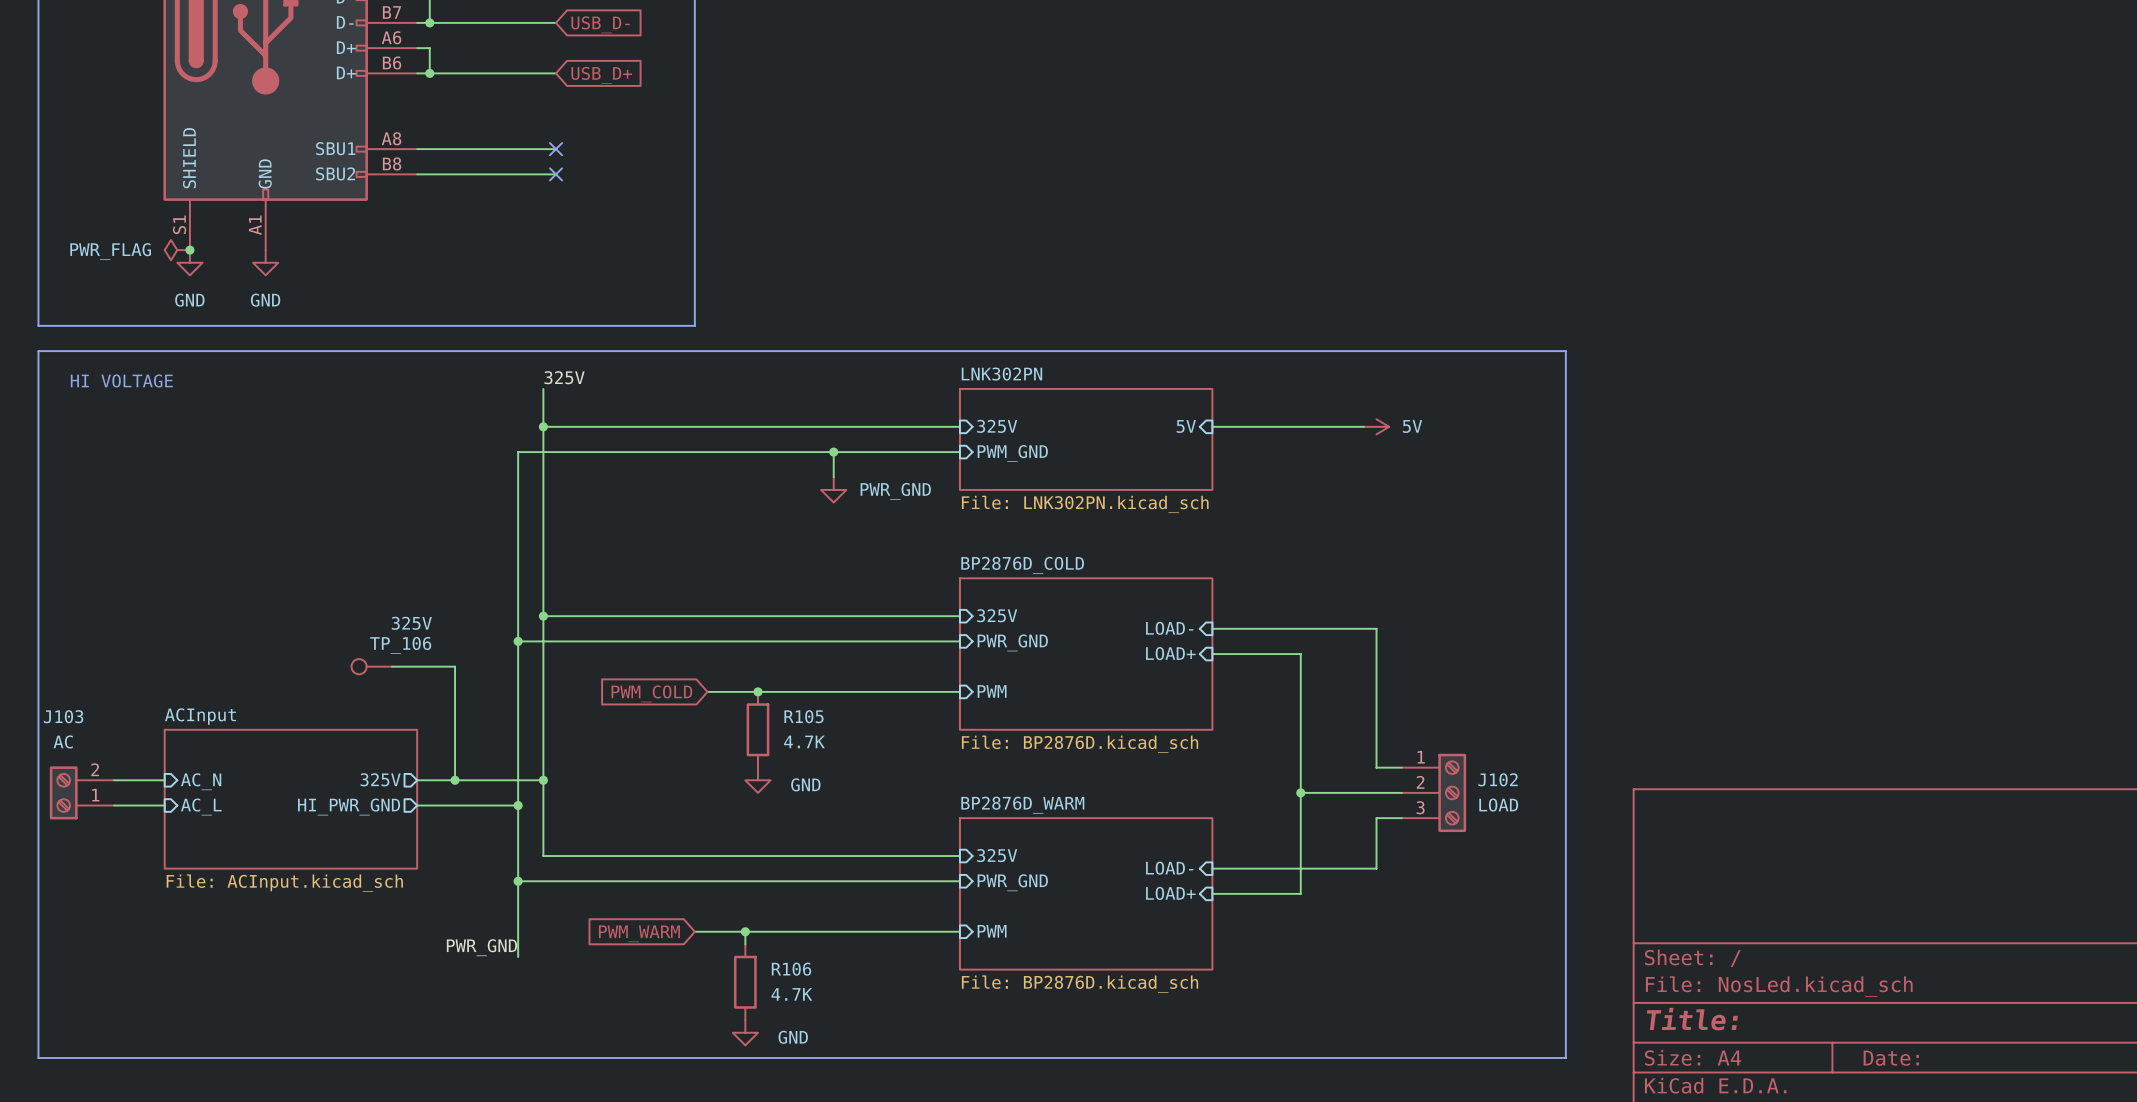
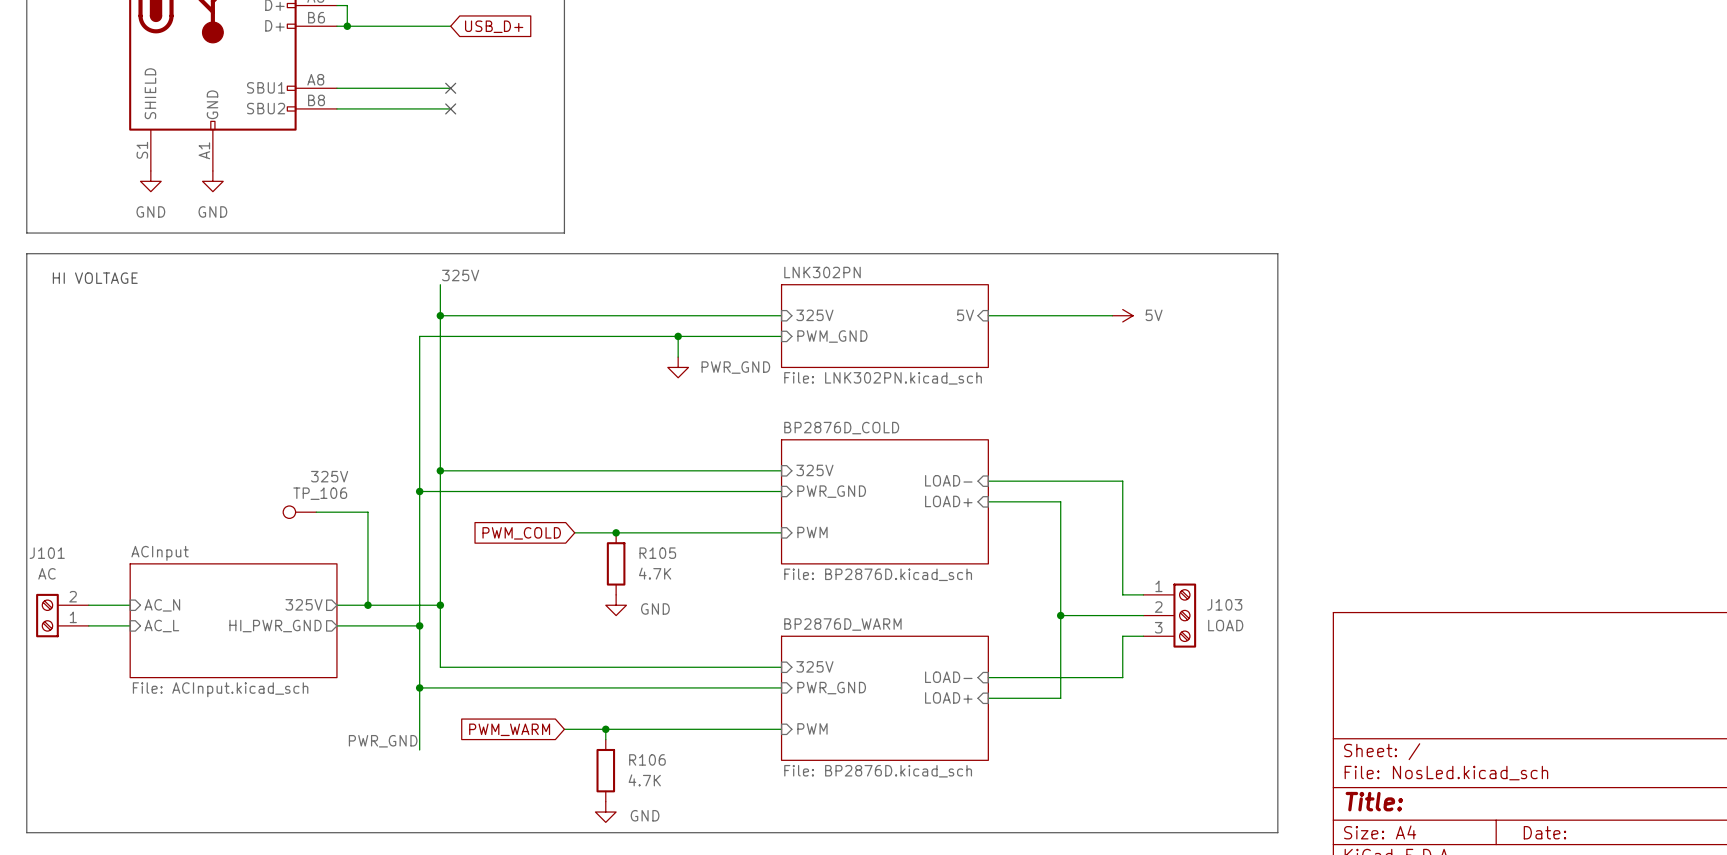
power symbol: PWR_FLAG (177, 250) -> none
junction: (189, 250) -> none
J103 name: J103 (63, 716) -> J101 (47, 553)
J102 name: J102 (1498, 779) -> J103 (1224, 604)

